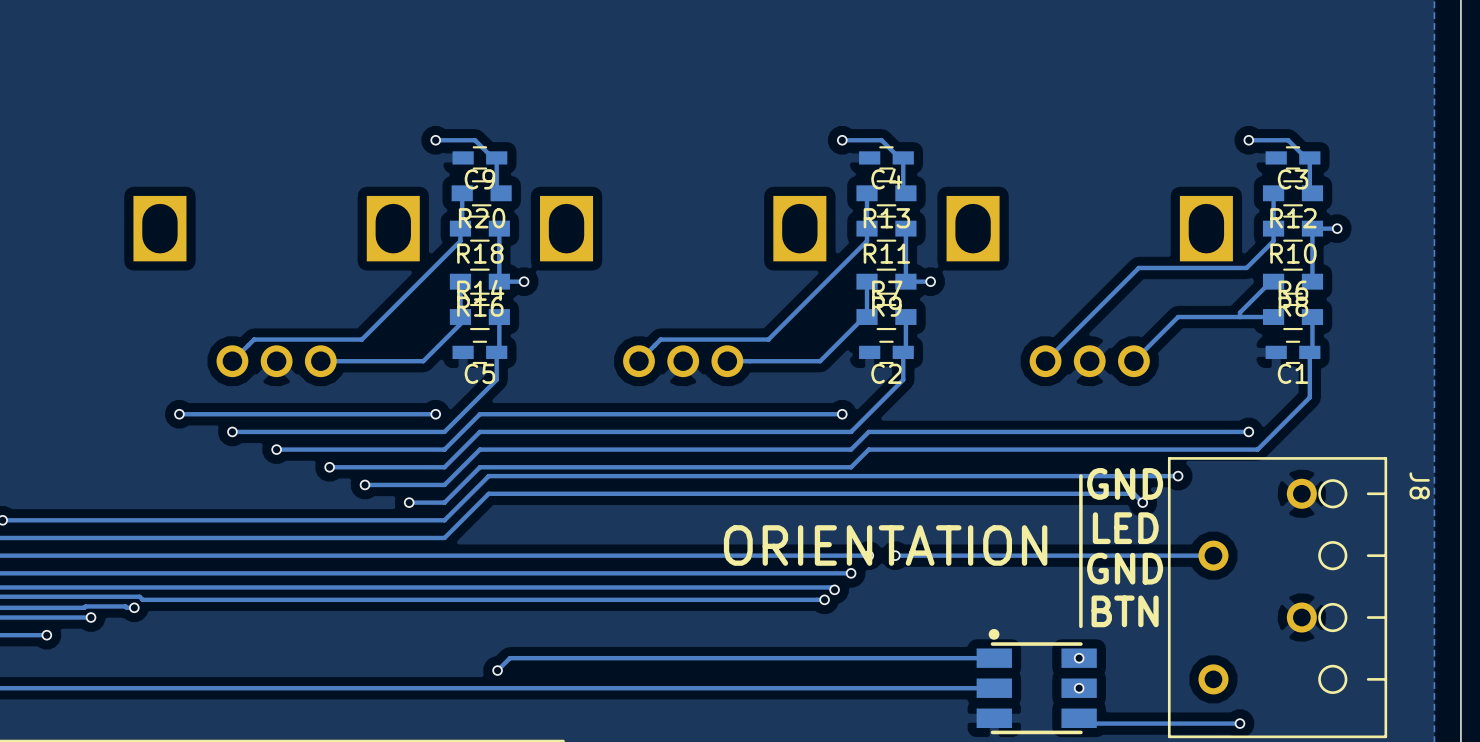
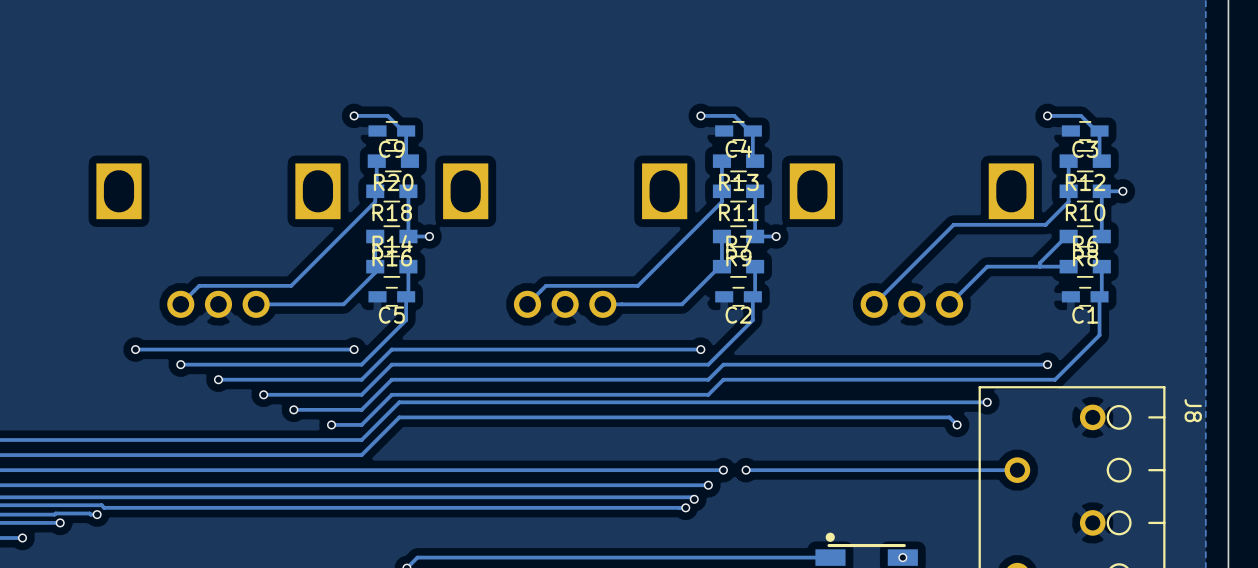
line: (1080, 476) (1080, 626) -> none
text: GND (1125, 483) -> none
text: LED (1125, 528) -> none
text: ORIENTATION (885, 545) -> none
text: GND (1125, 568) -> none
text: BTN (1125, 611) -> none

